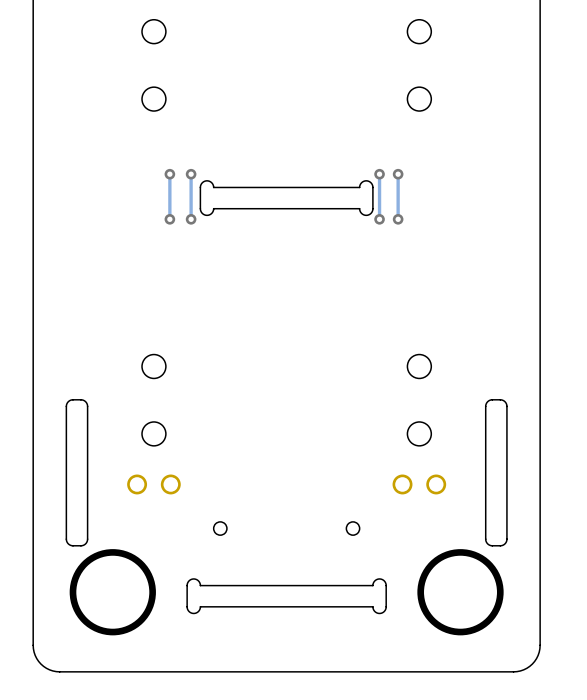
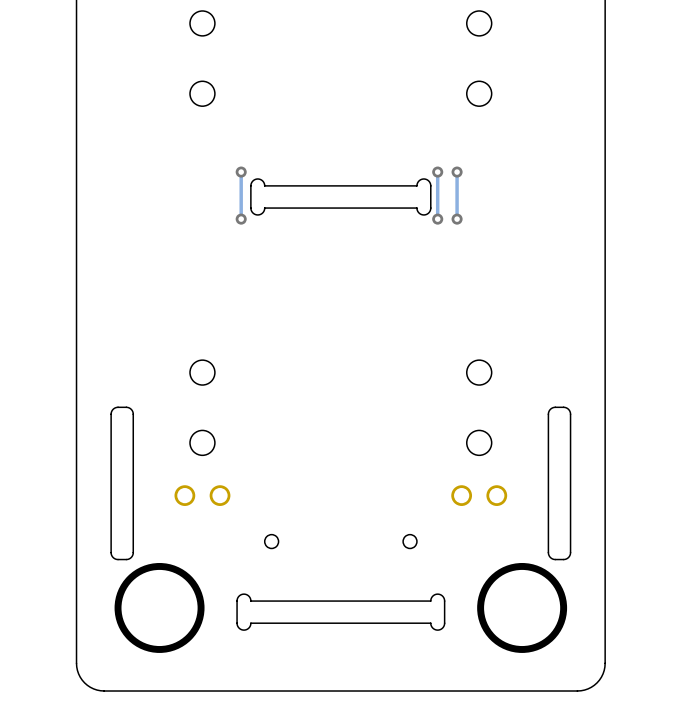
track: (169, 174) (169, 219) -> none
via: (169, 174) -> none
via: (169, 219) -> none

